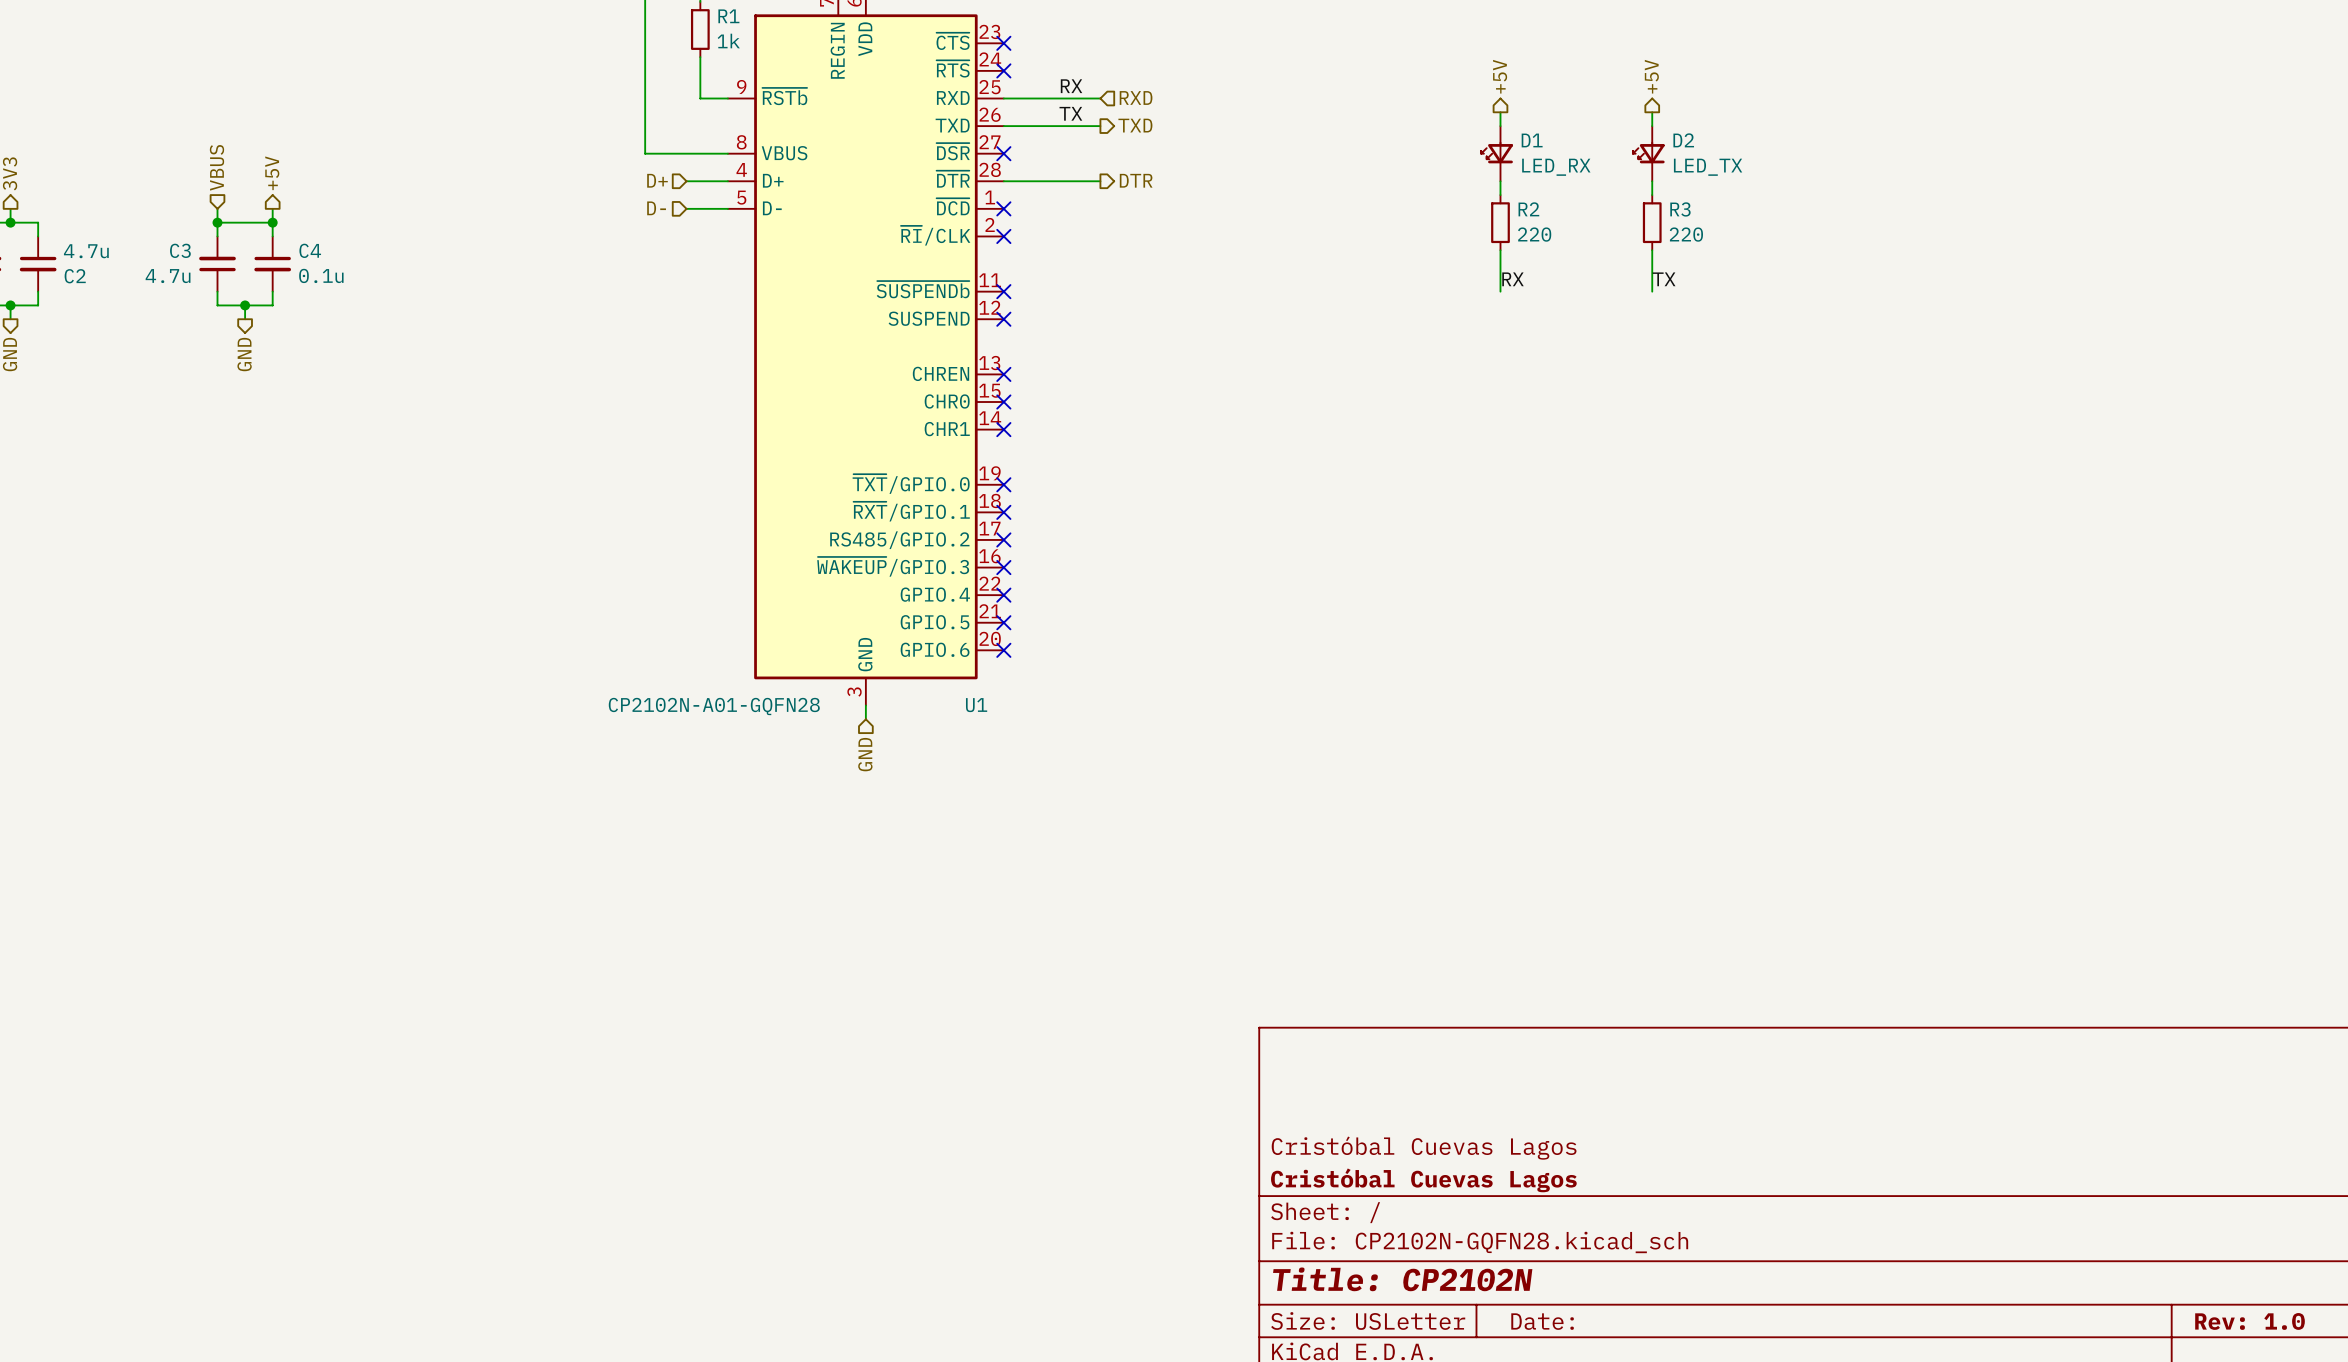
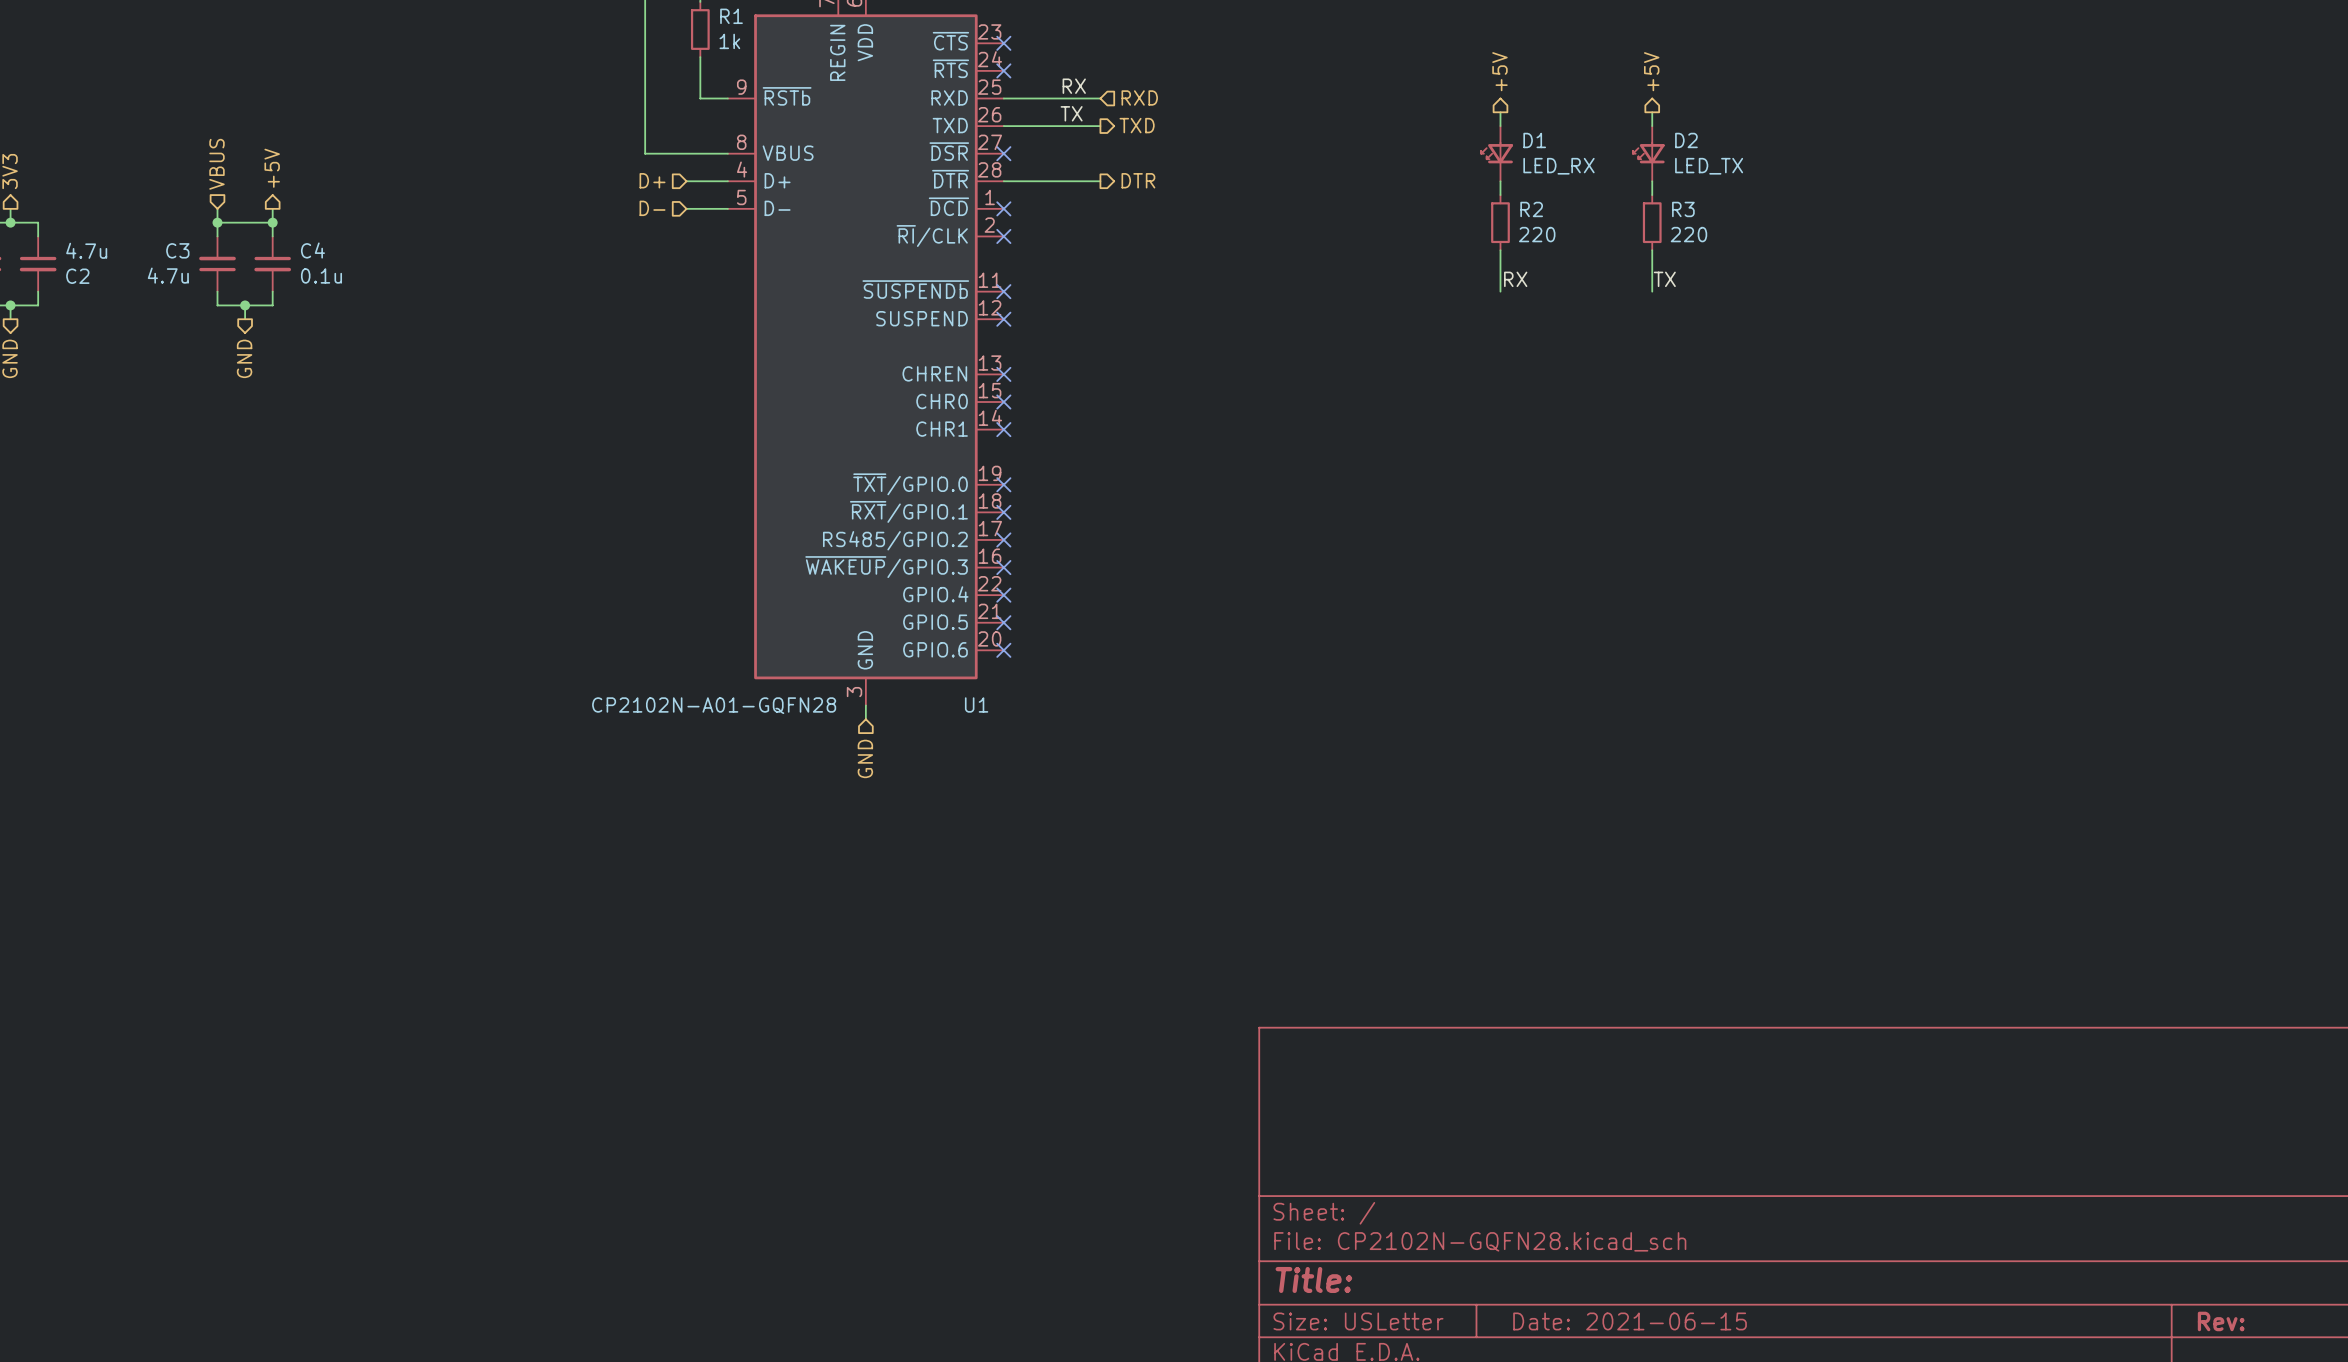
title block: Cristóbal Cuevas Lagos (1424, 1148) -> none
title block: Cristóbal Cuevas Lagos (1423, 1180) -> none
title block: Title: CP2102N (1402, 1279) -> Title: (1313, 1279)
title block: Date: (1542, 1321) -> Date: 2021-06-15 (1630, 1321)
title block: Rev: 1.0 (2250, 1321) -> Rev: (2221, 1321)

